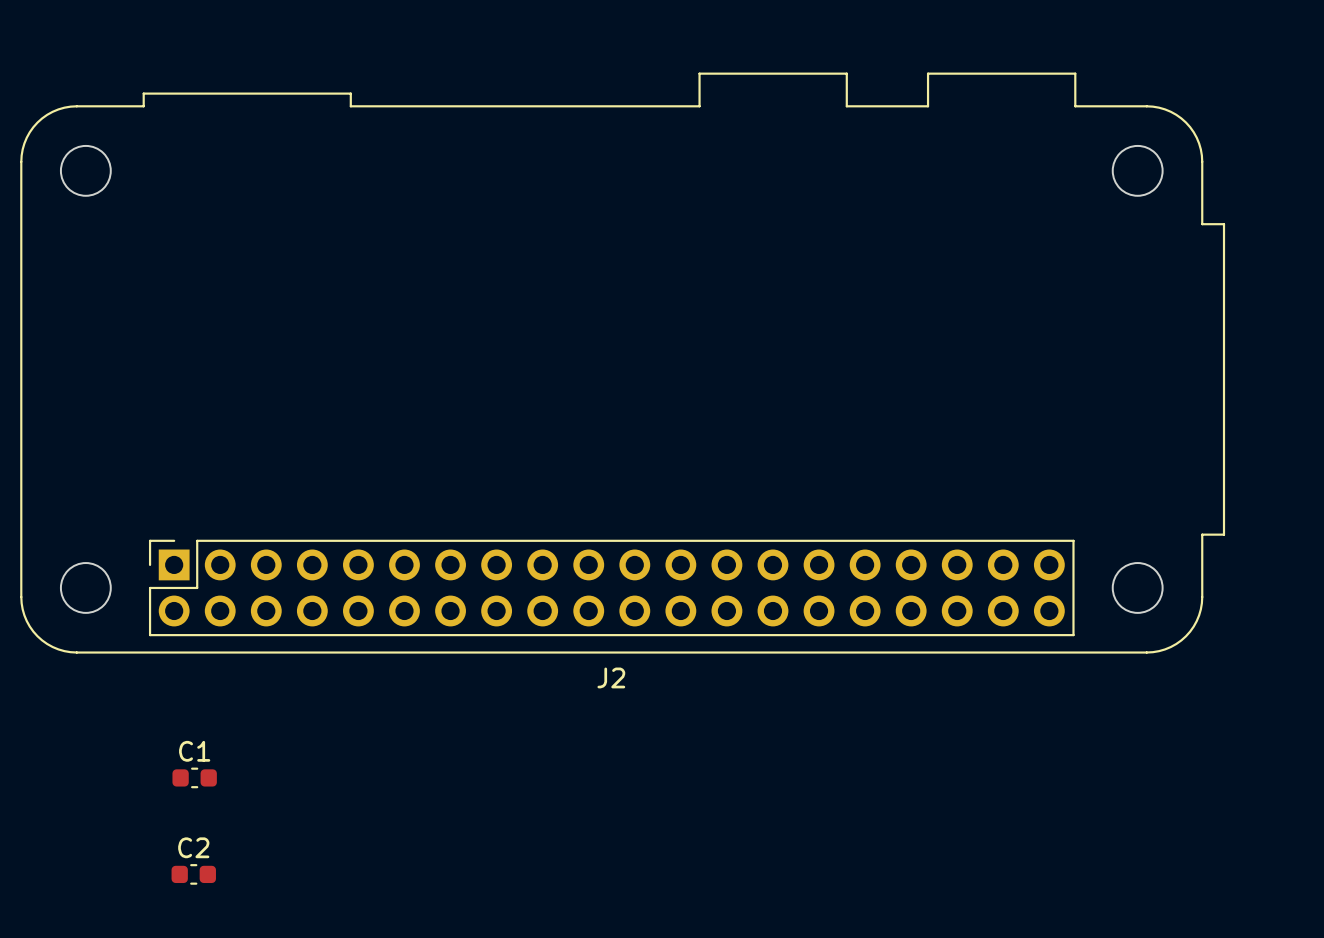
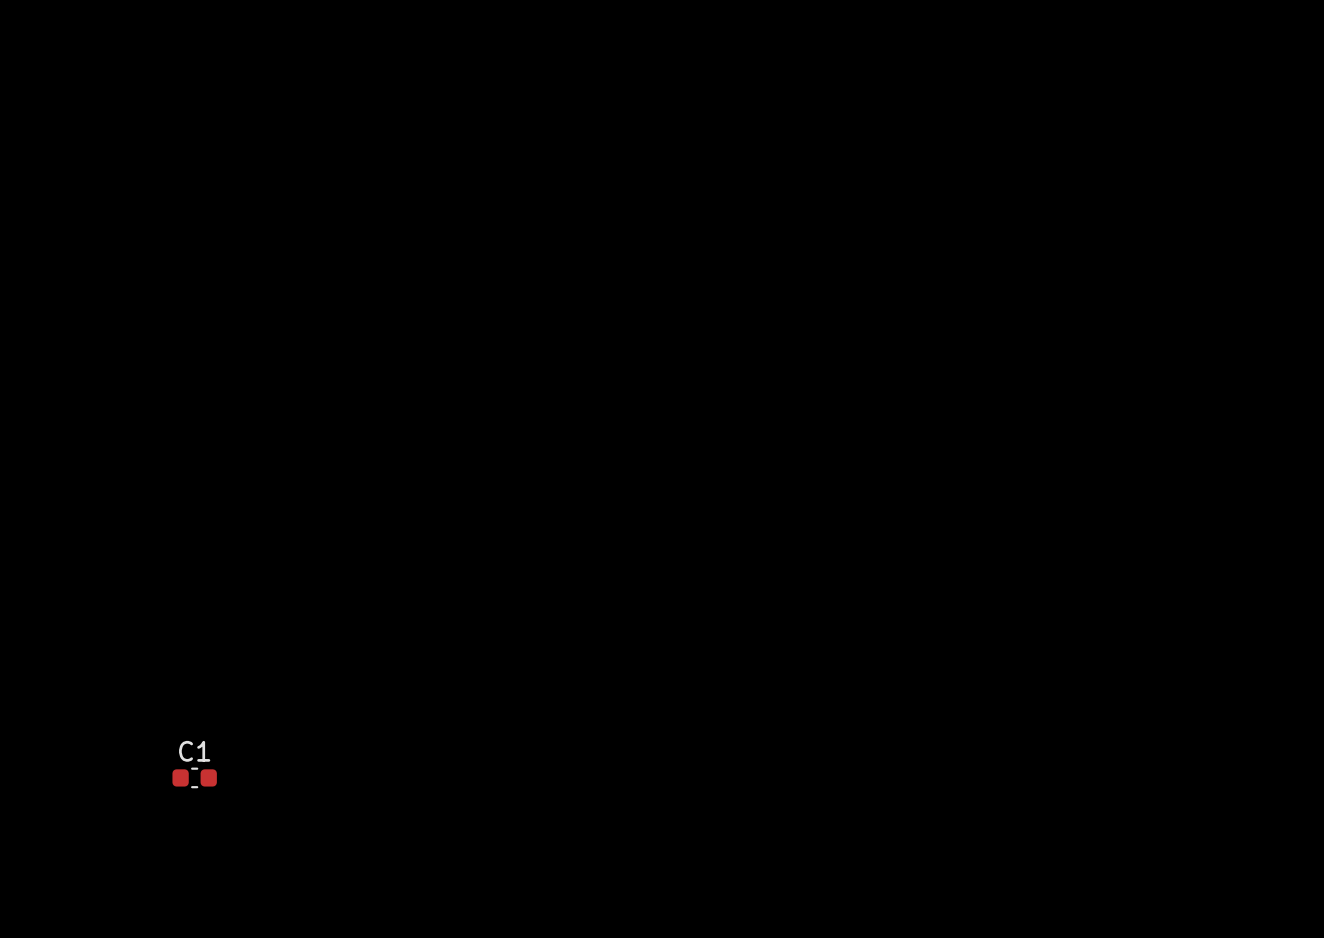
J2: (622, 363) -> none
C2: (193, 874) -> none

